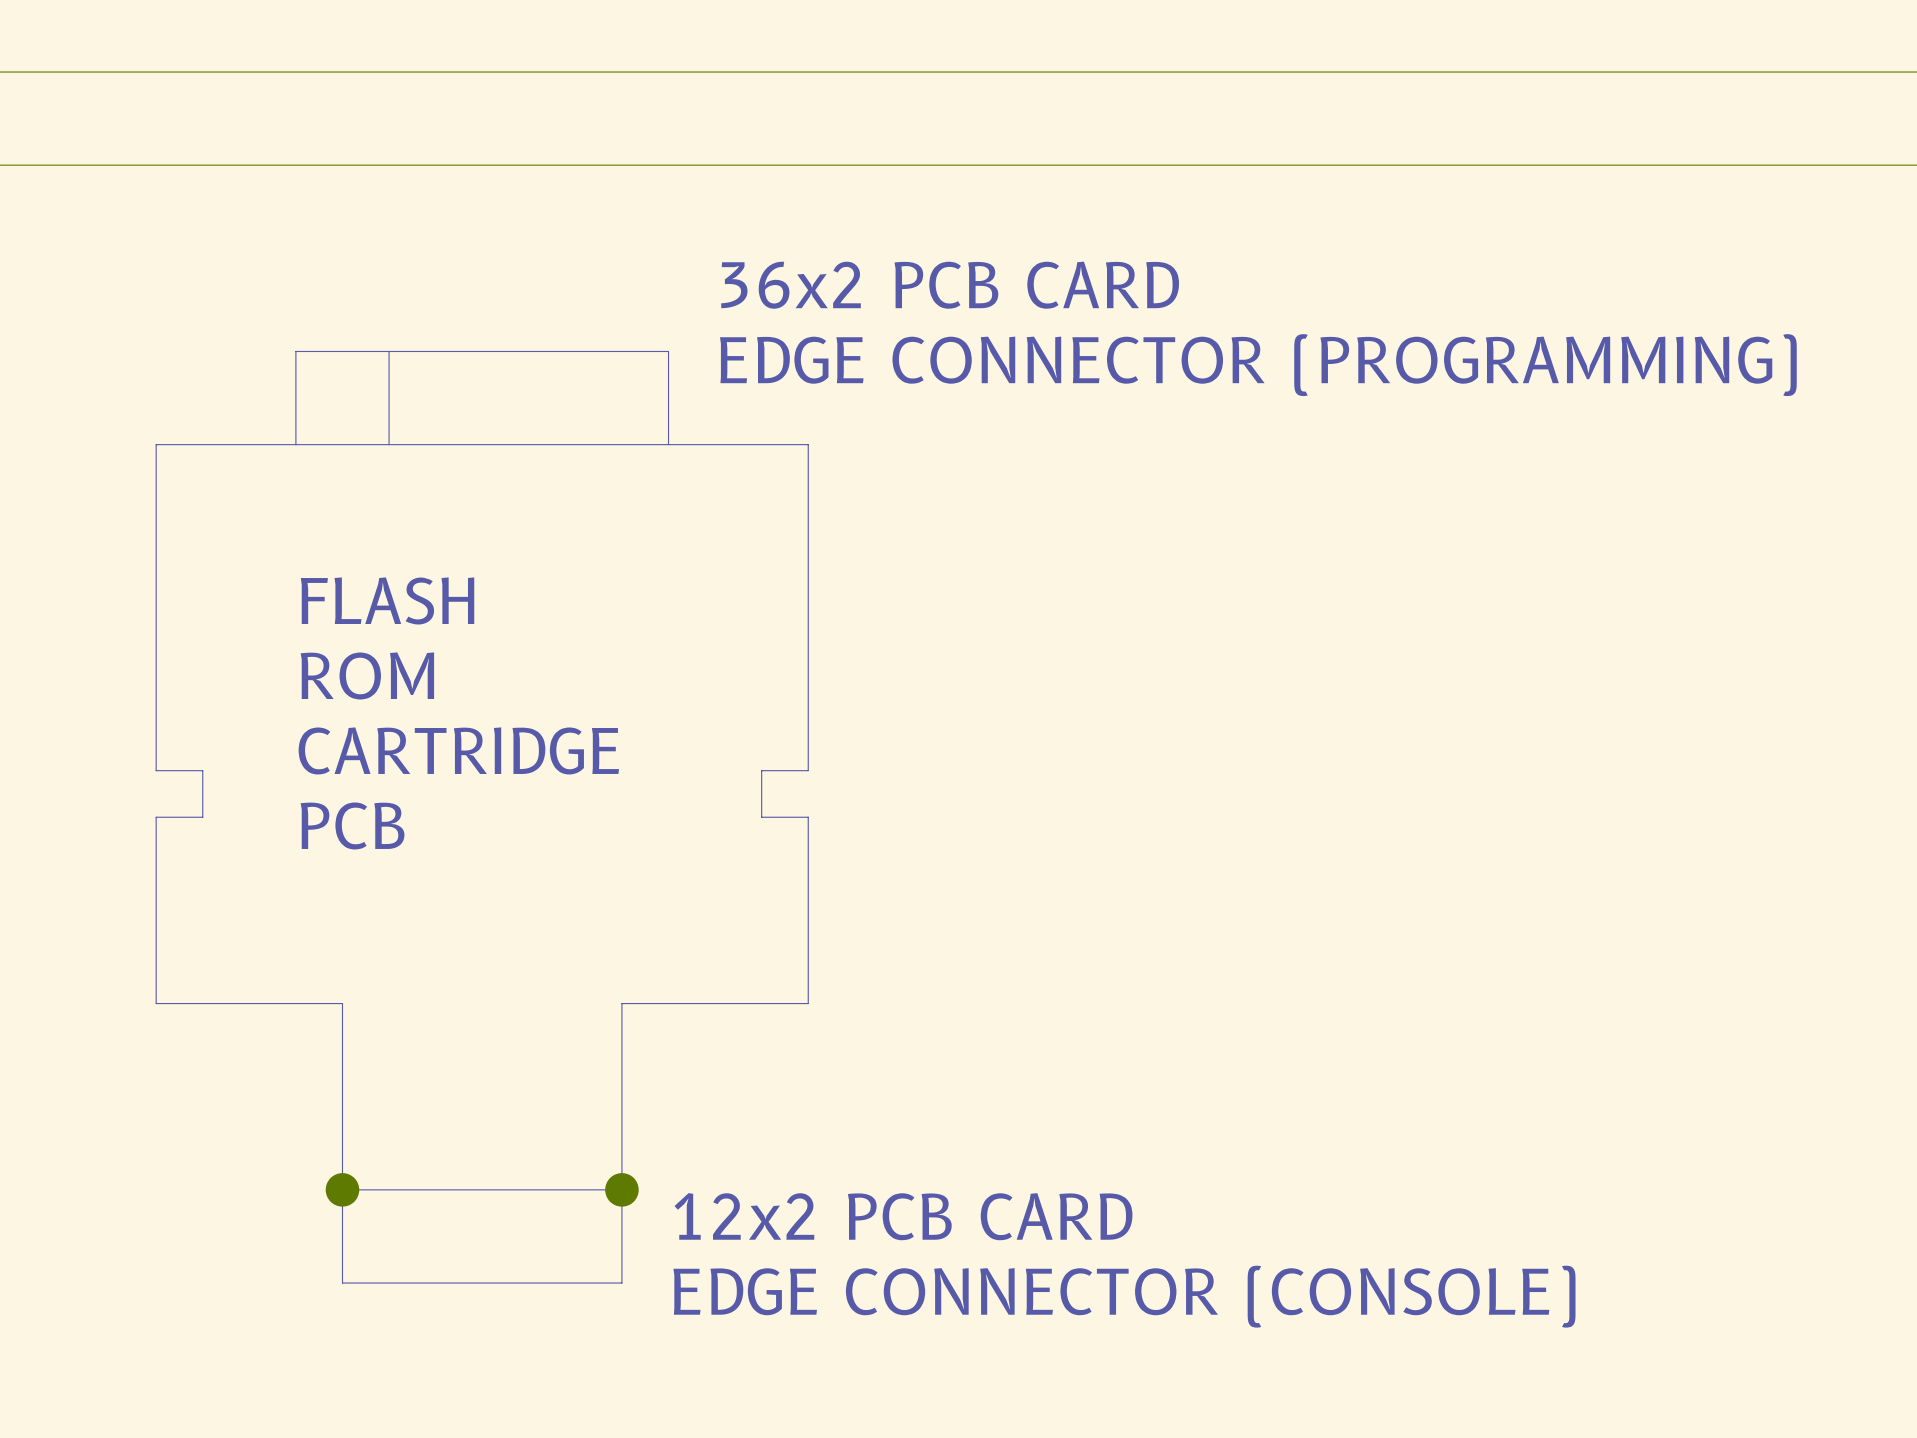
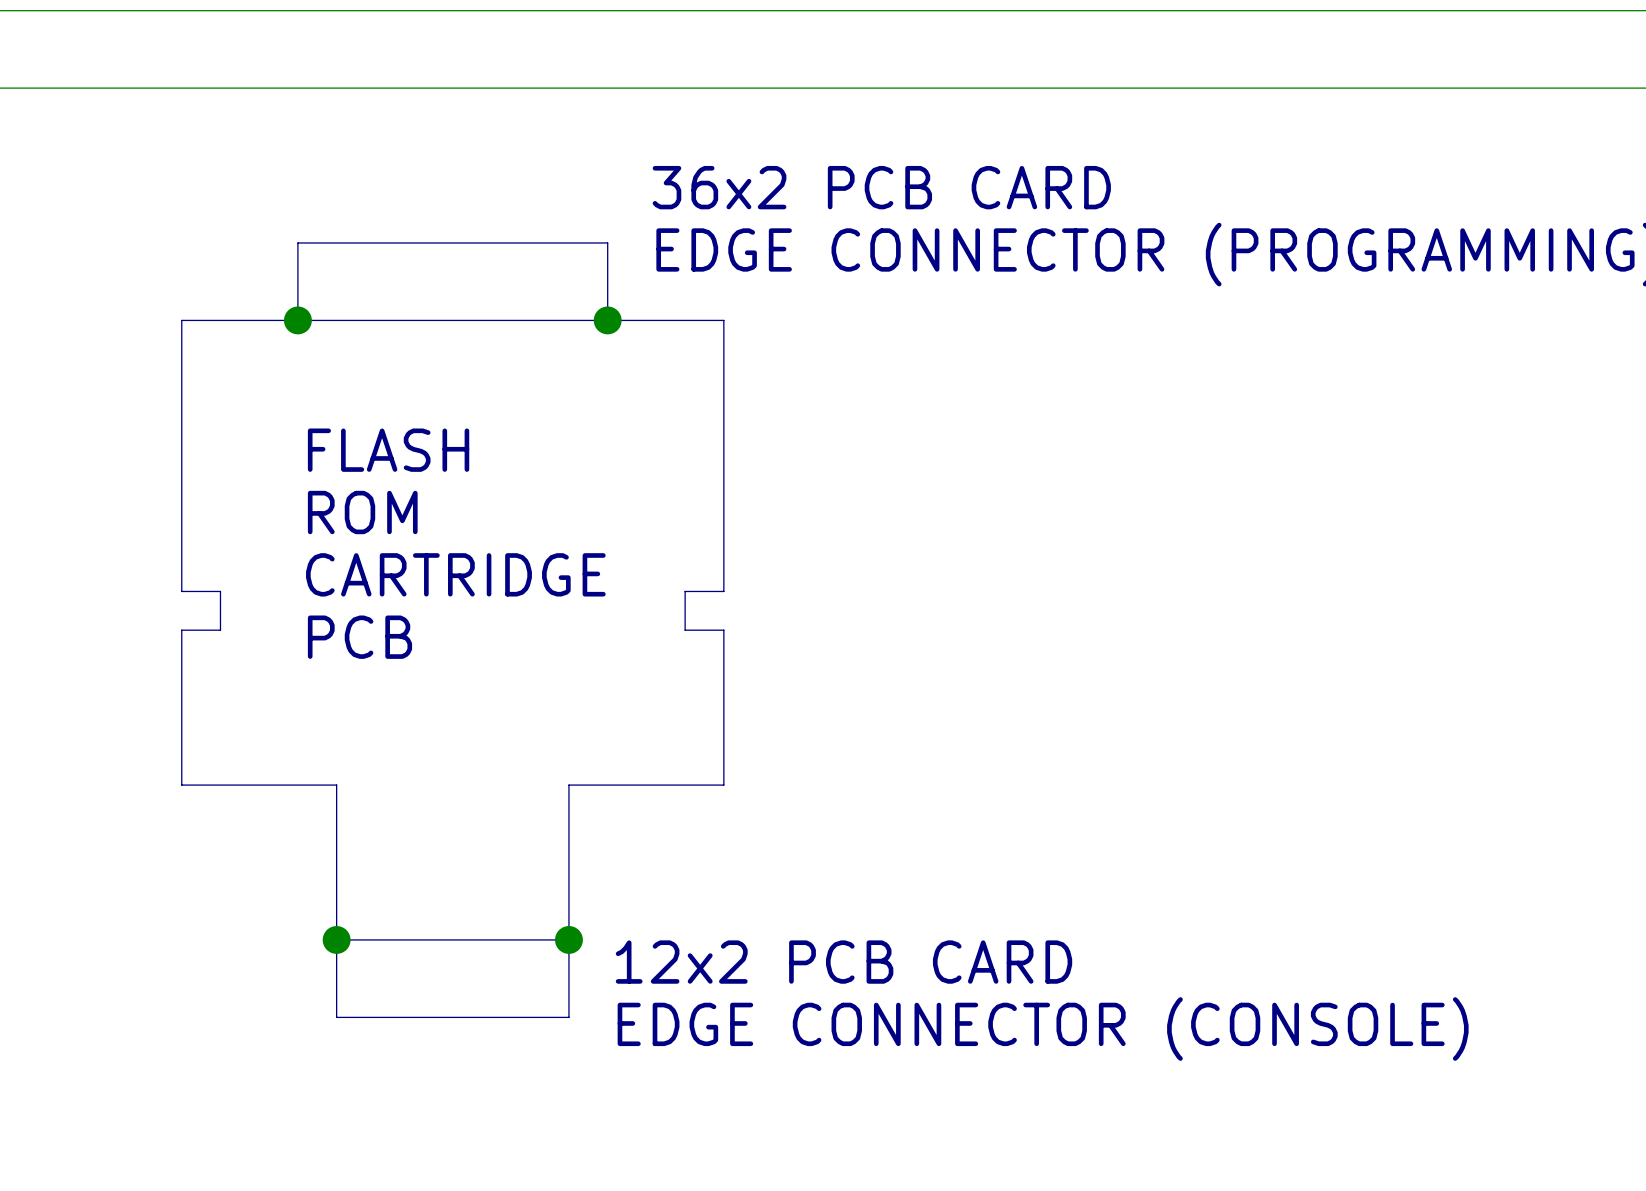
bus: (389, 351) (389, 444) -> none
junction: none -> (297, 320)
junction: none -> (607, 320)

